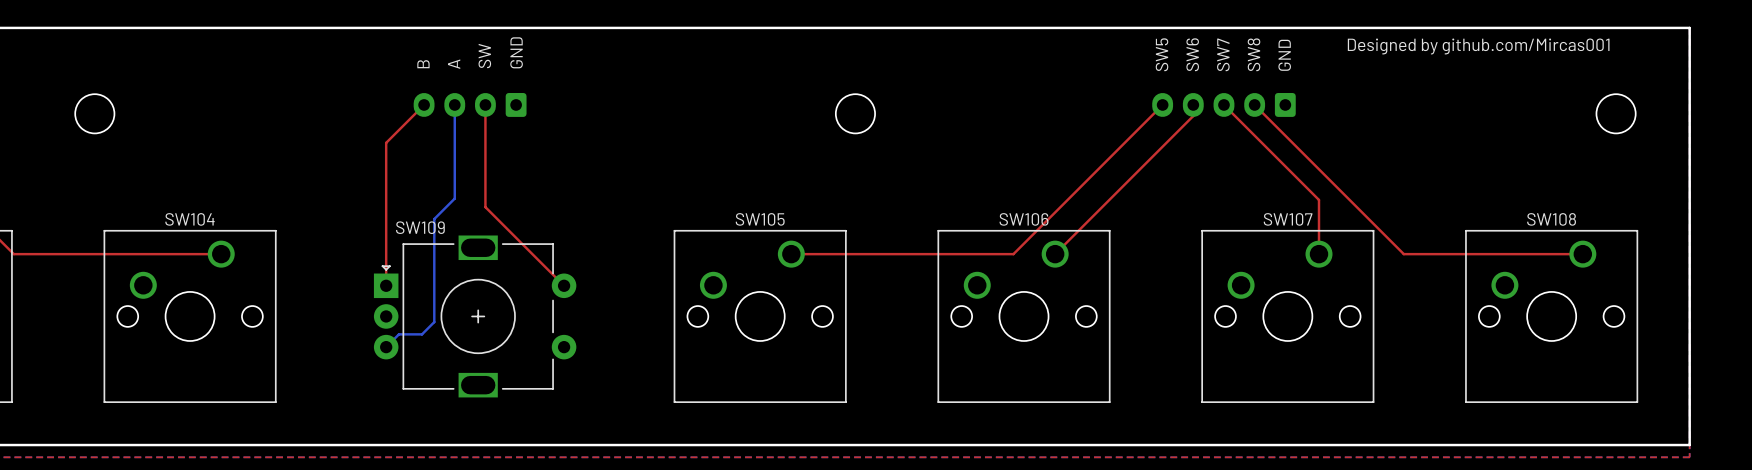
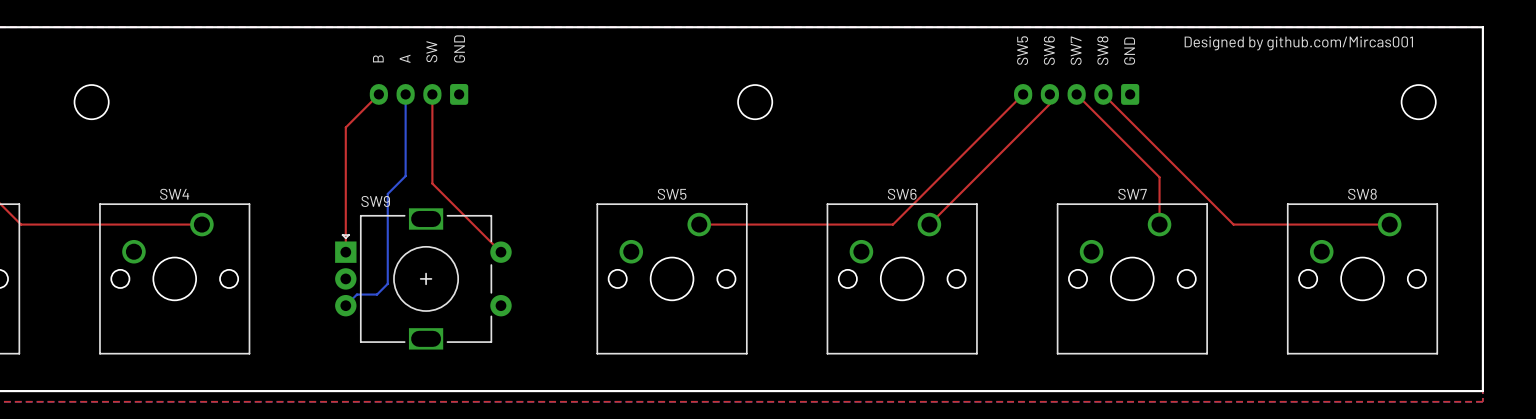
SW104 name: SW104 (190, 219) -> SW4 (174, 194)
SW105 name: SW105 (760, 219) -> SW5 (672, 194)
SW106 name: SW106 (1024, 219) -> SW6 (902, 194)
SW107 name: SW107 (1288, 219) -> SW7 (1132, 194)
SW108 name: SW108 (1551, 219) -> SW8 (1362, 194)
SW109 name: SW109 (420, 227) -> SW9 (375, 201)

